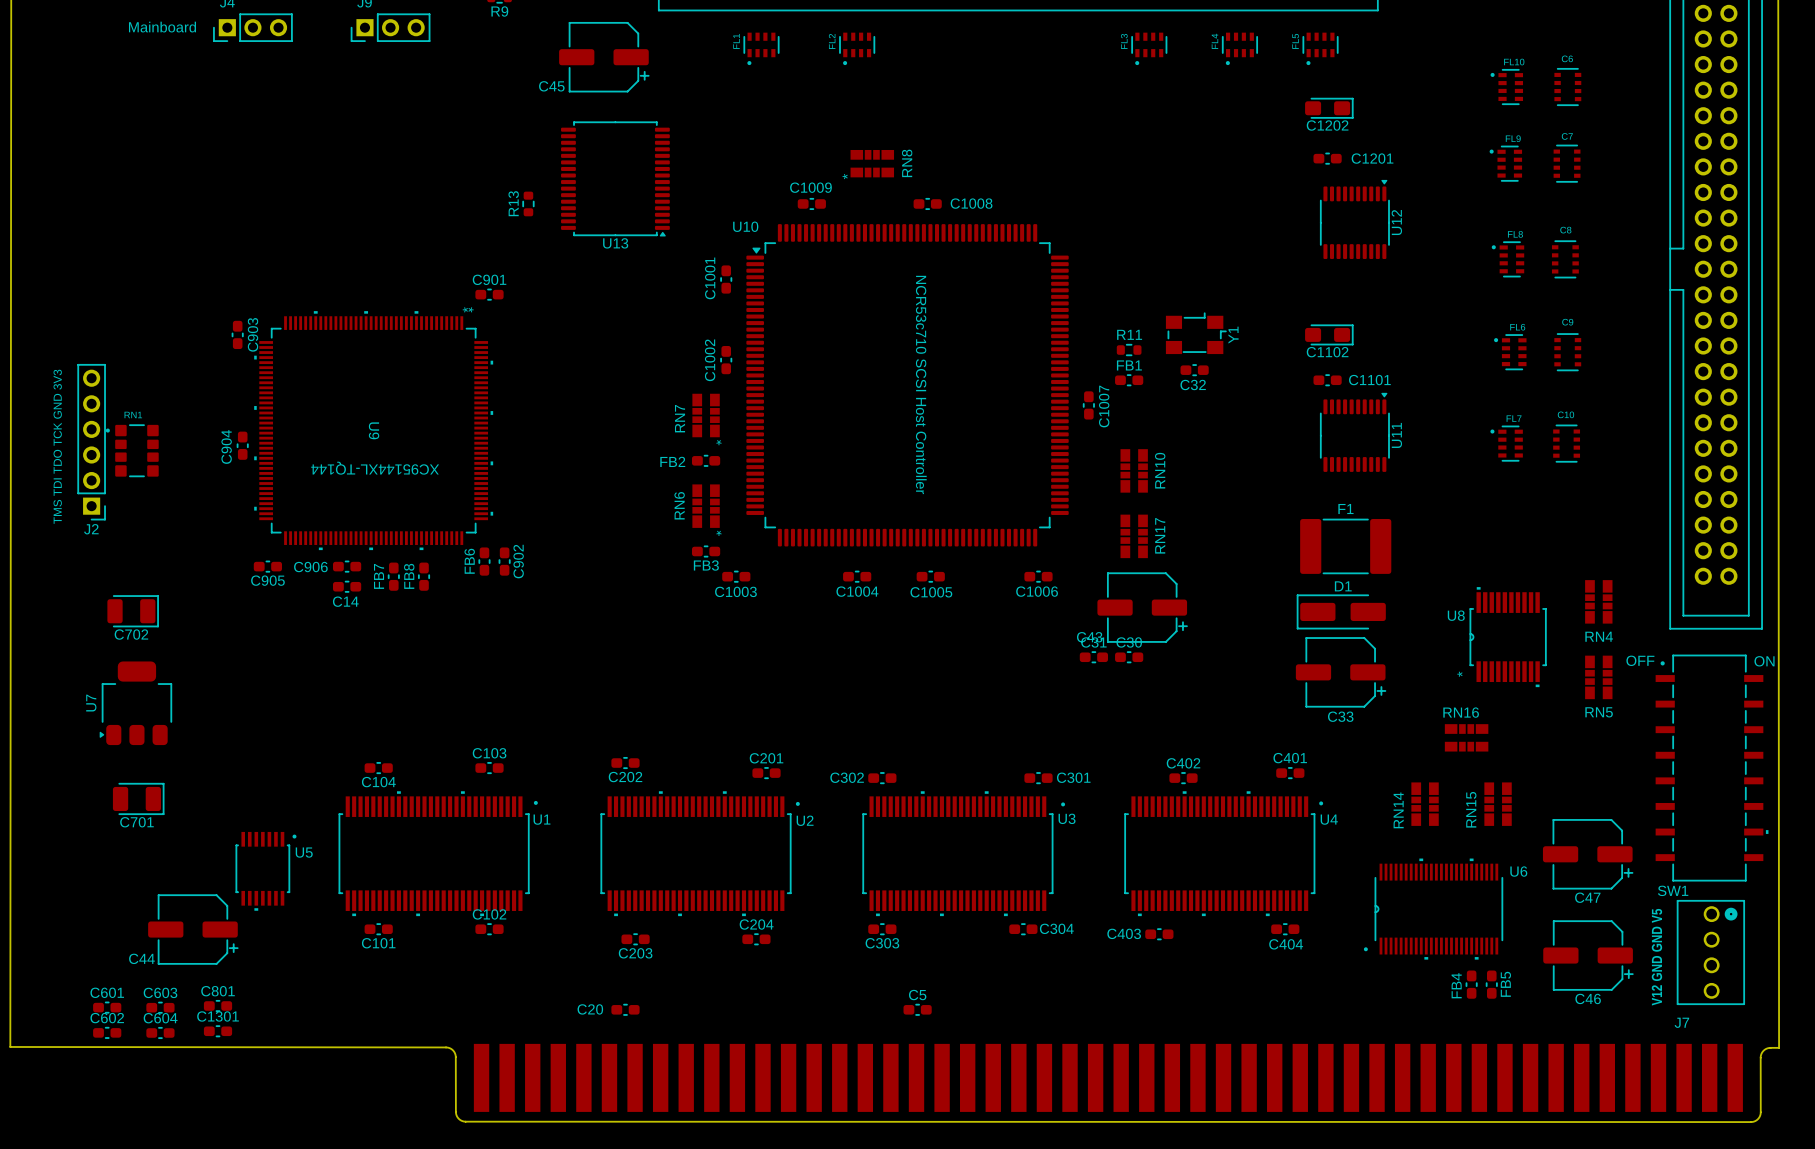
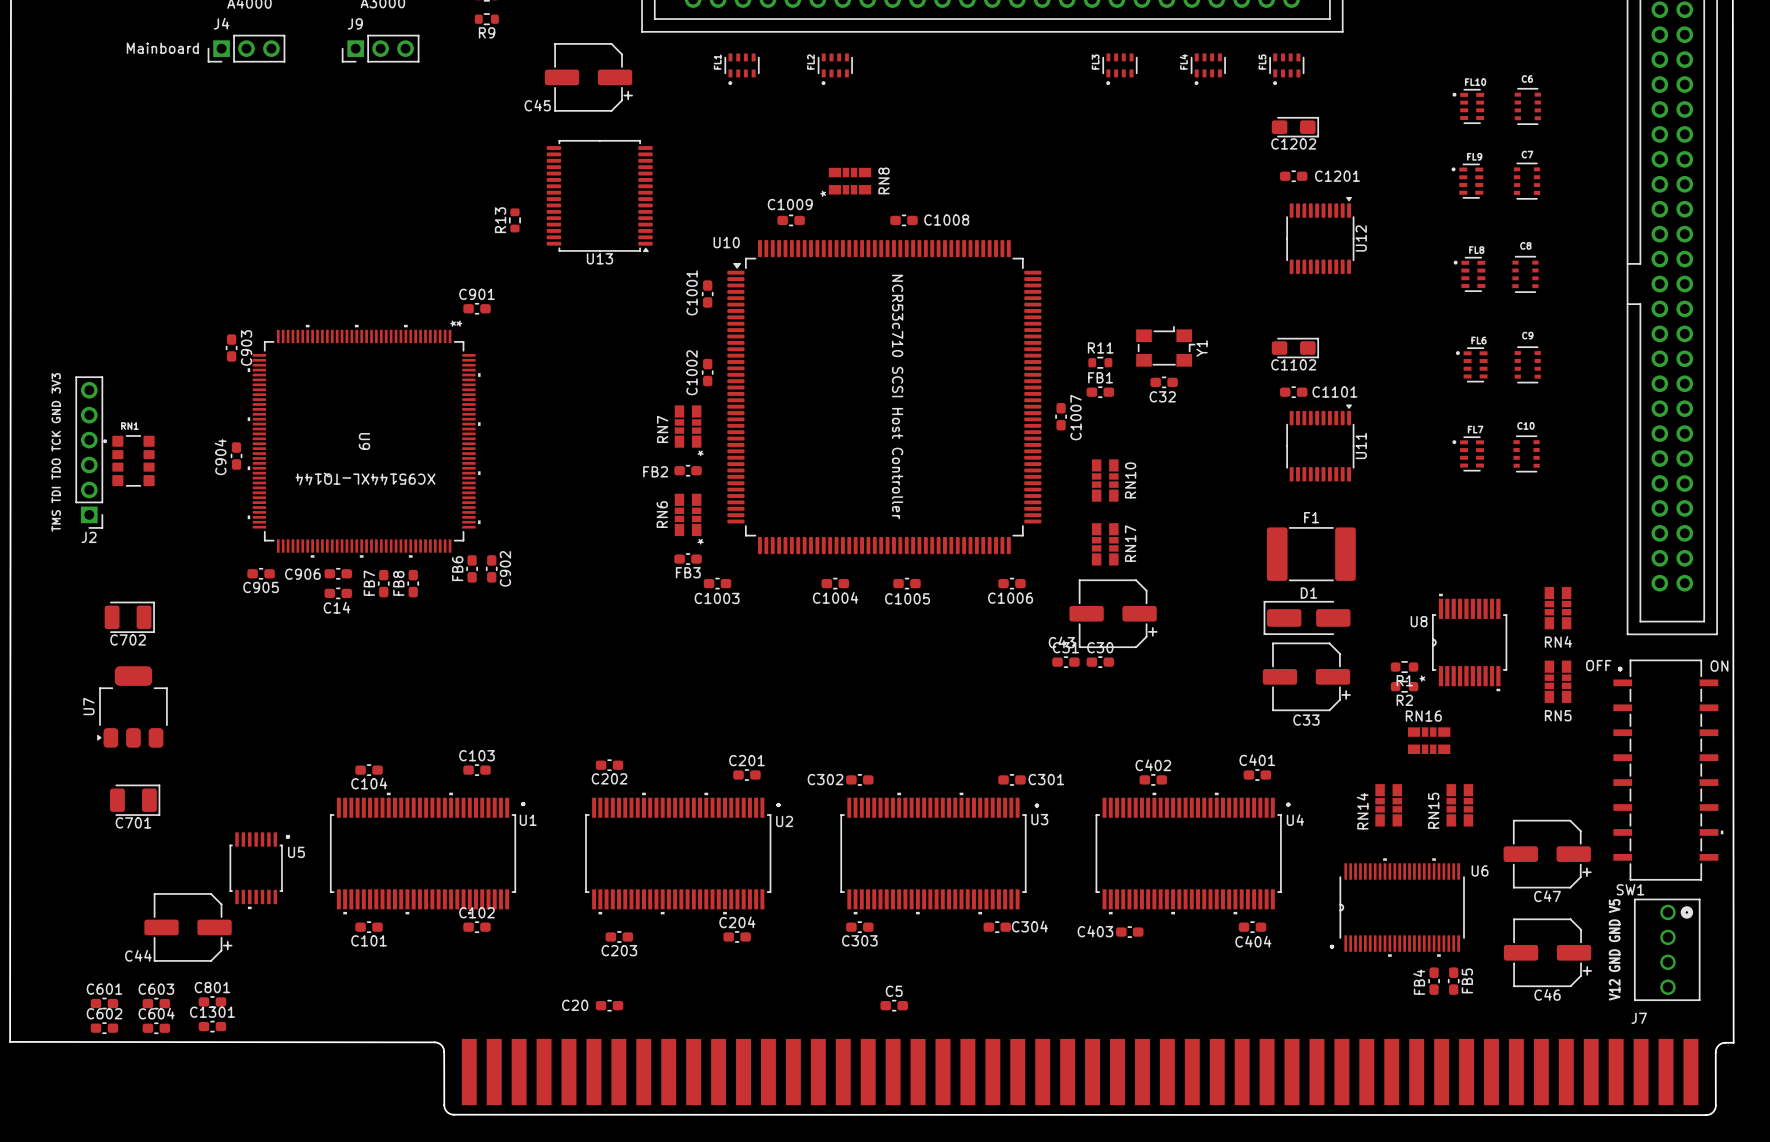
R1: none -> (1404, 667)
R2: none -> (1404, 686)

